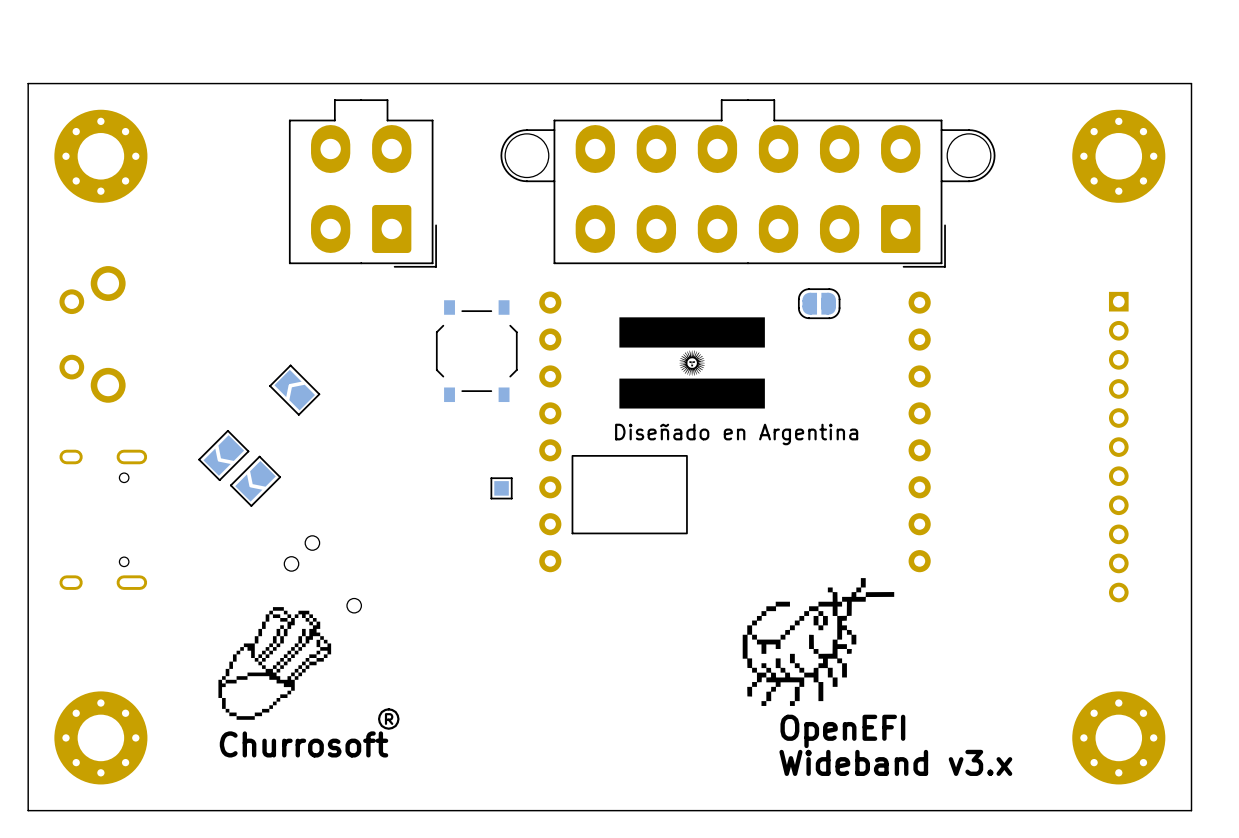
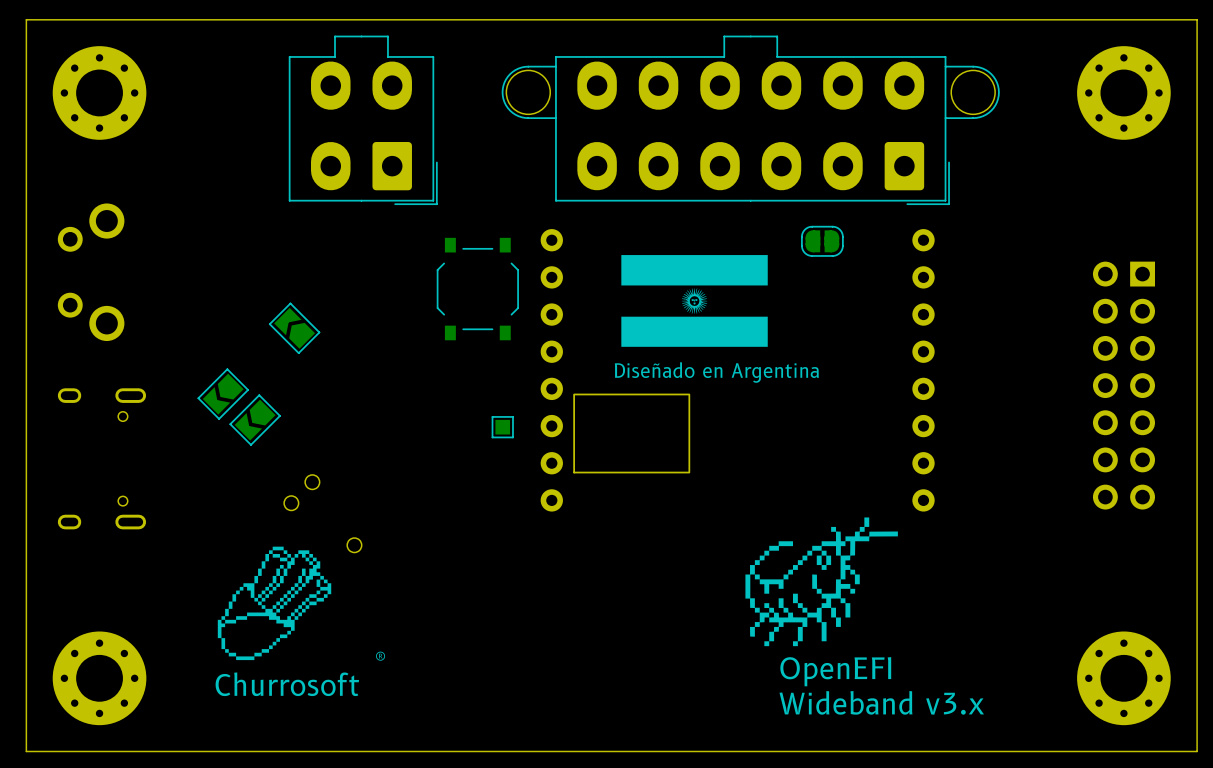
part footprint: [1108, 291, 1129, 603] -> [1092, 261, 1156, 510]

